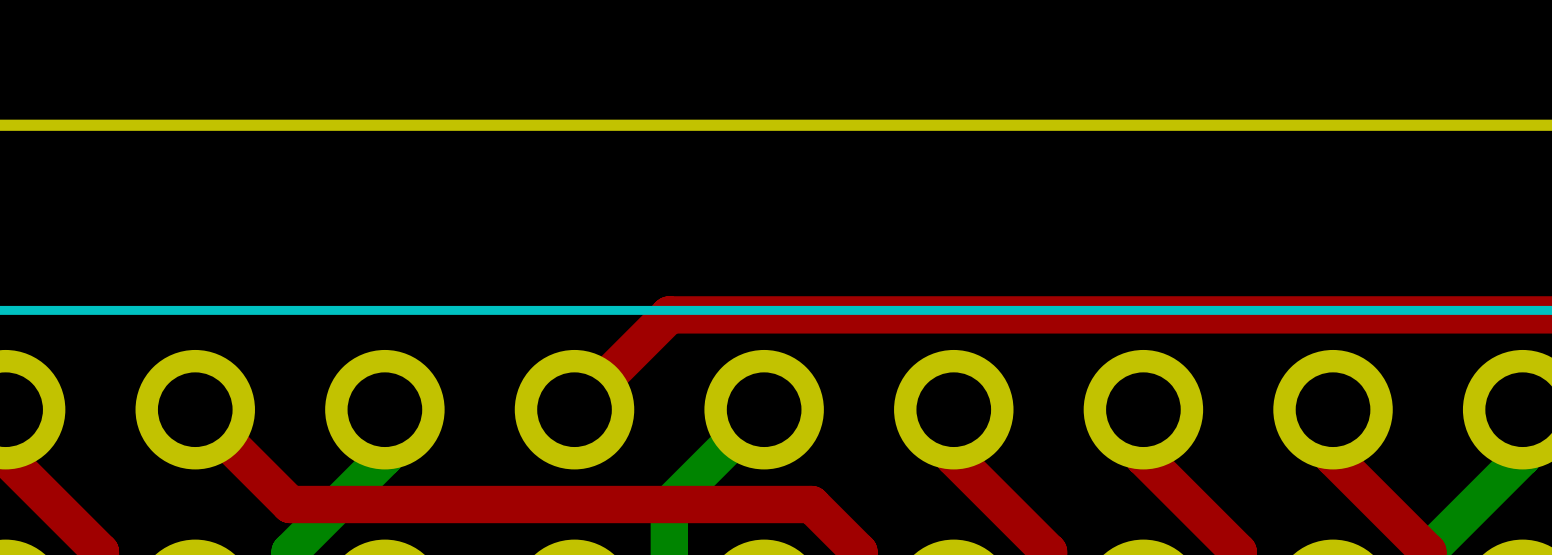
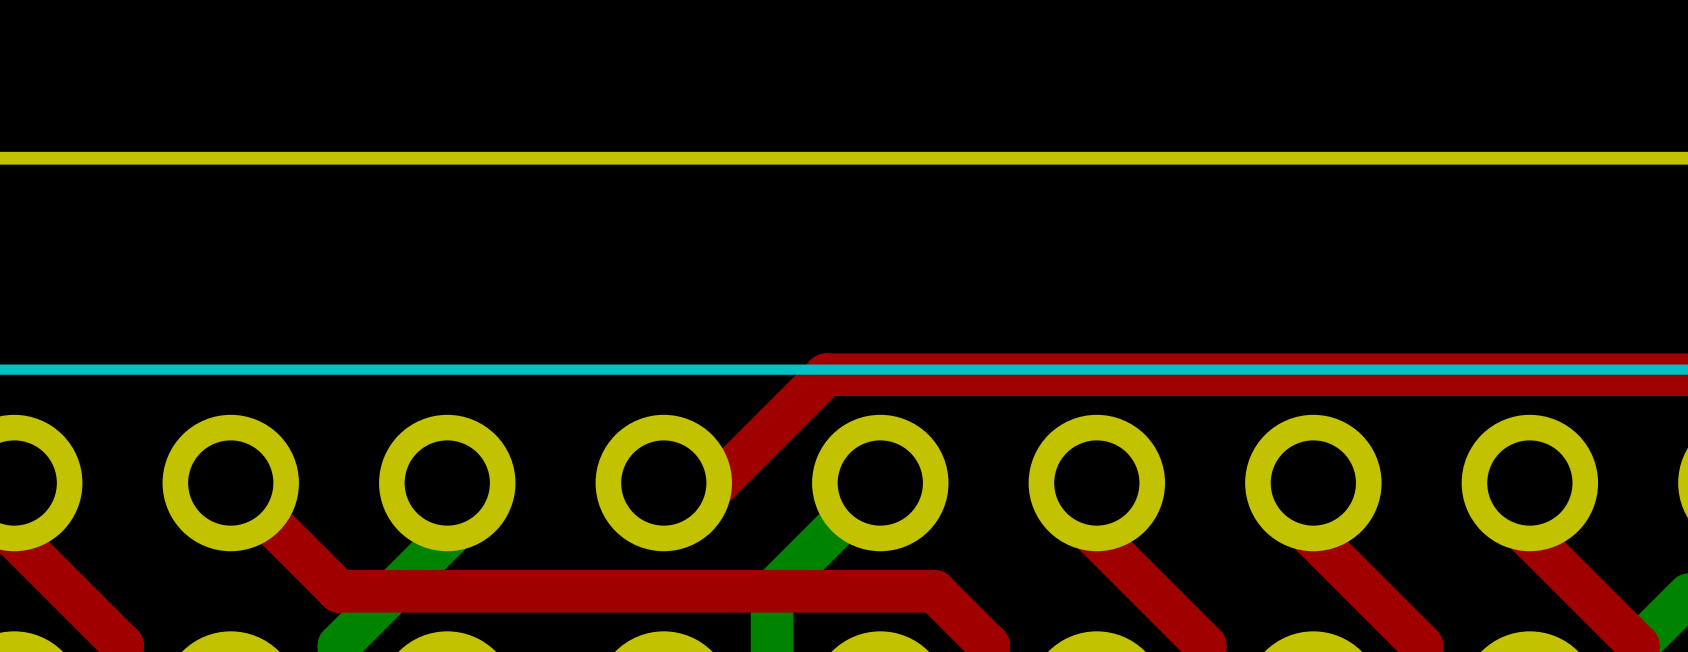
top track: (716, 314) (669, 314) (574, 409) -> (826, 374) (717, 483) (663, 483)

